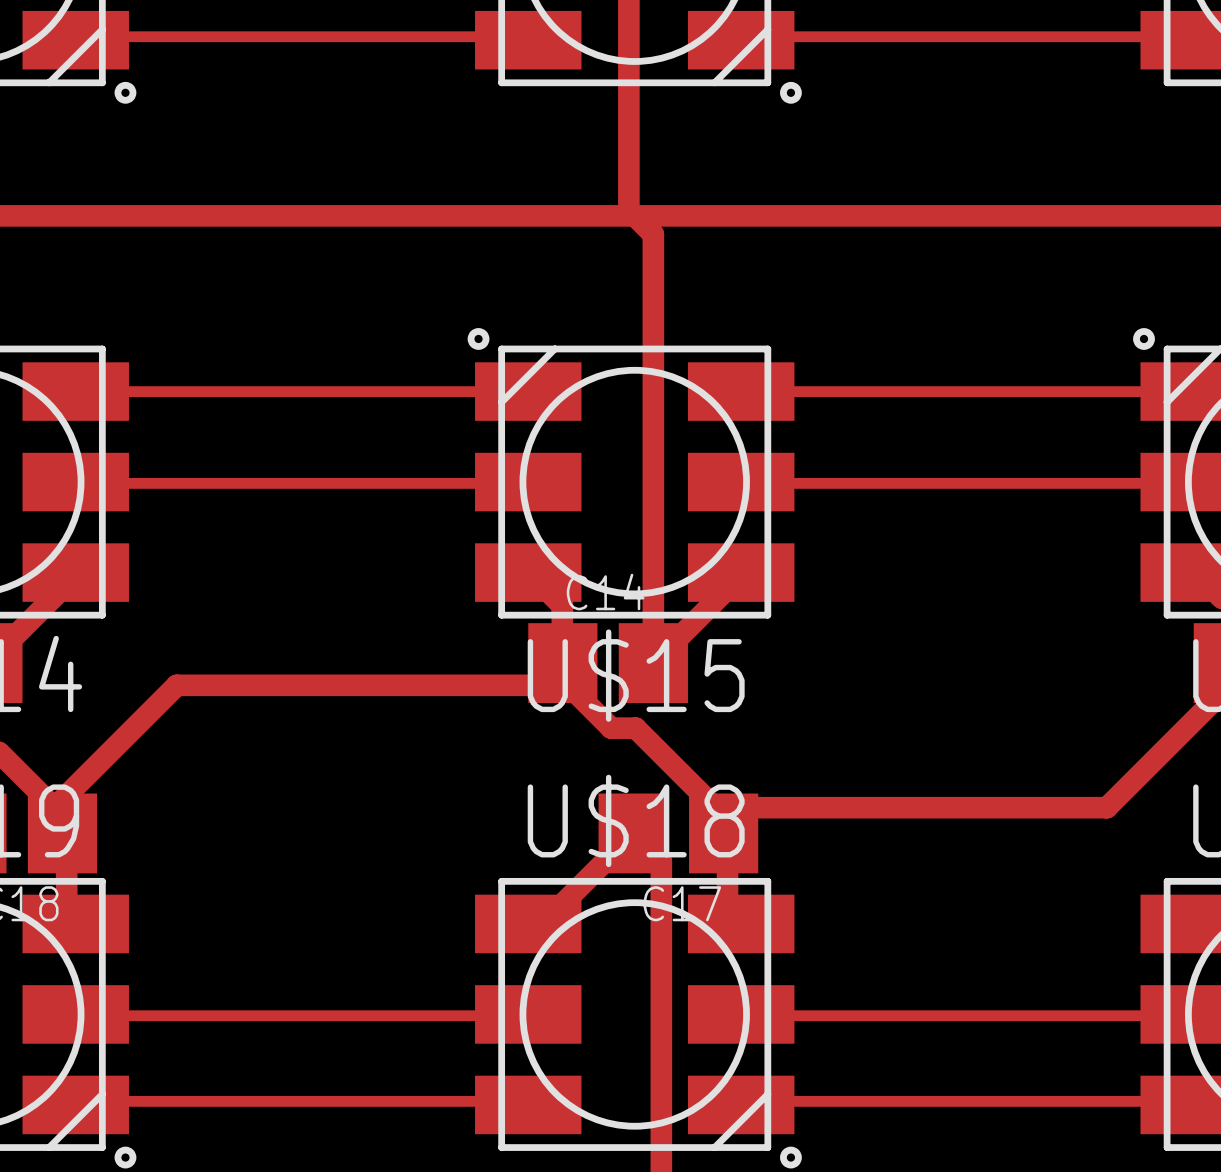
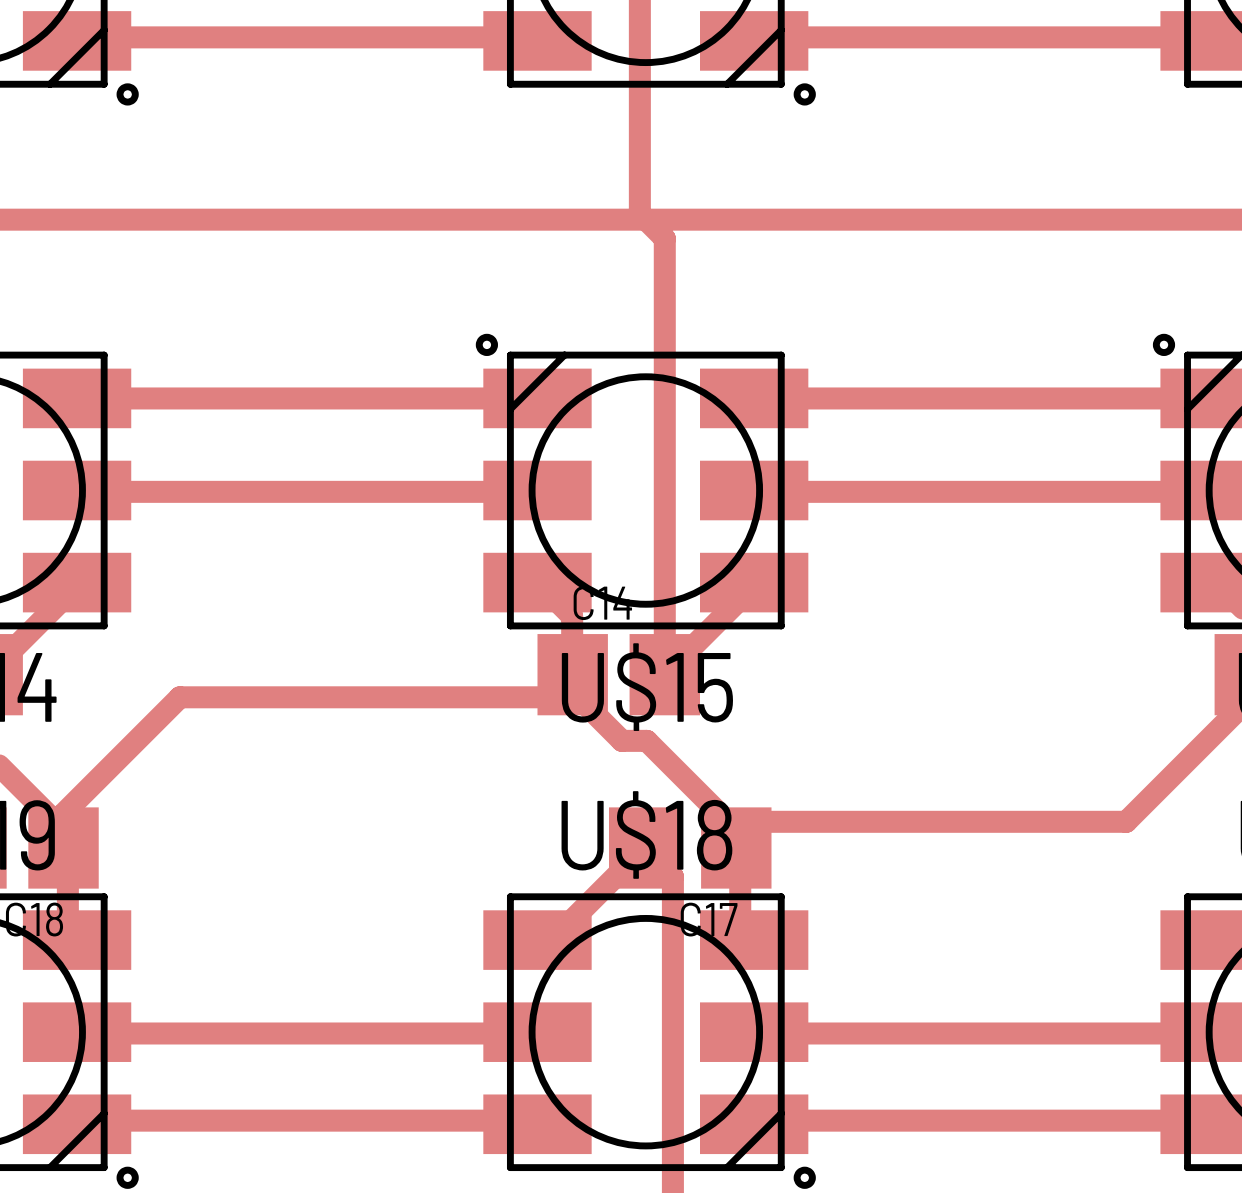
top track width: thin (78, 36) (525, 36) -> thick (80, 37) (534, 37)
top track width: thin (745, 36) (1192, 36) -> thick (758, 37) (1213, 37)
top track width: thin (78, 391) (525, 391) -> thick (80, 398) (534, 398)
top track width: thin (745, 391) (1192, 391) -> thick (758, 398) (1213, 398)
top track width: thin (78, 483) (525, 483) -> thick (80, 491) (534, 491)
top track width: thin (745, 483) (1192, 483) -> thick (758, 491) (1213, 491)
top track width: thin (78, 1015) (525, 1015) -> thick (80, 1033) (534, 1033)
top track width: thin (745, 1015) (1192, 1015) -> thick (758, 1033) (1213, 1033)
top track width: thin (78, 1101) (525, 1101) -> thick (80, 1120) (534, 1120)
top track width: thin (745, 1101) (1192, 1101) -> thick (758, 1120) (1213, 1120)

